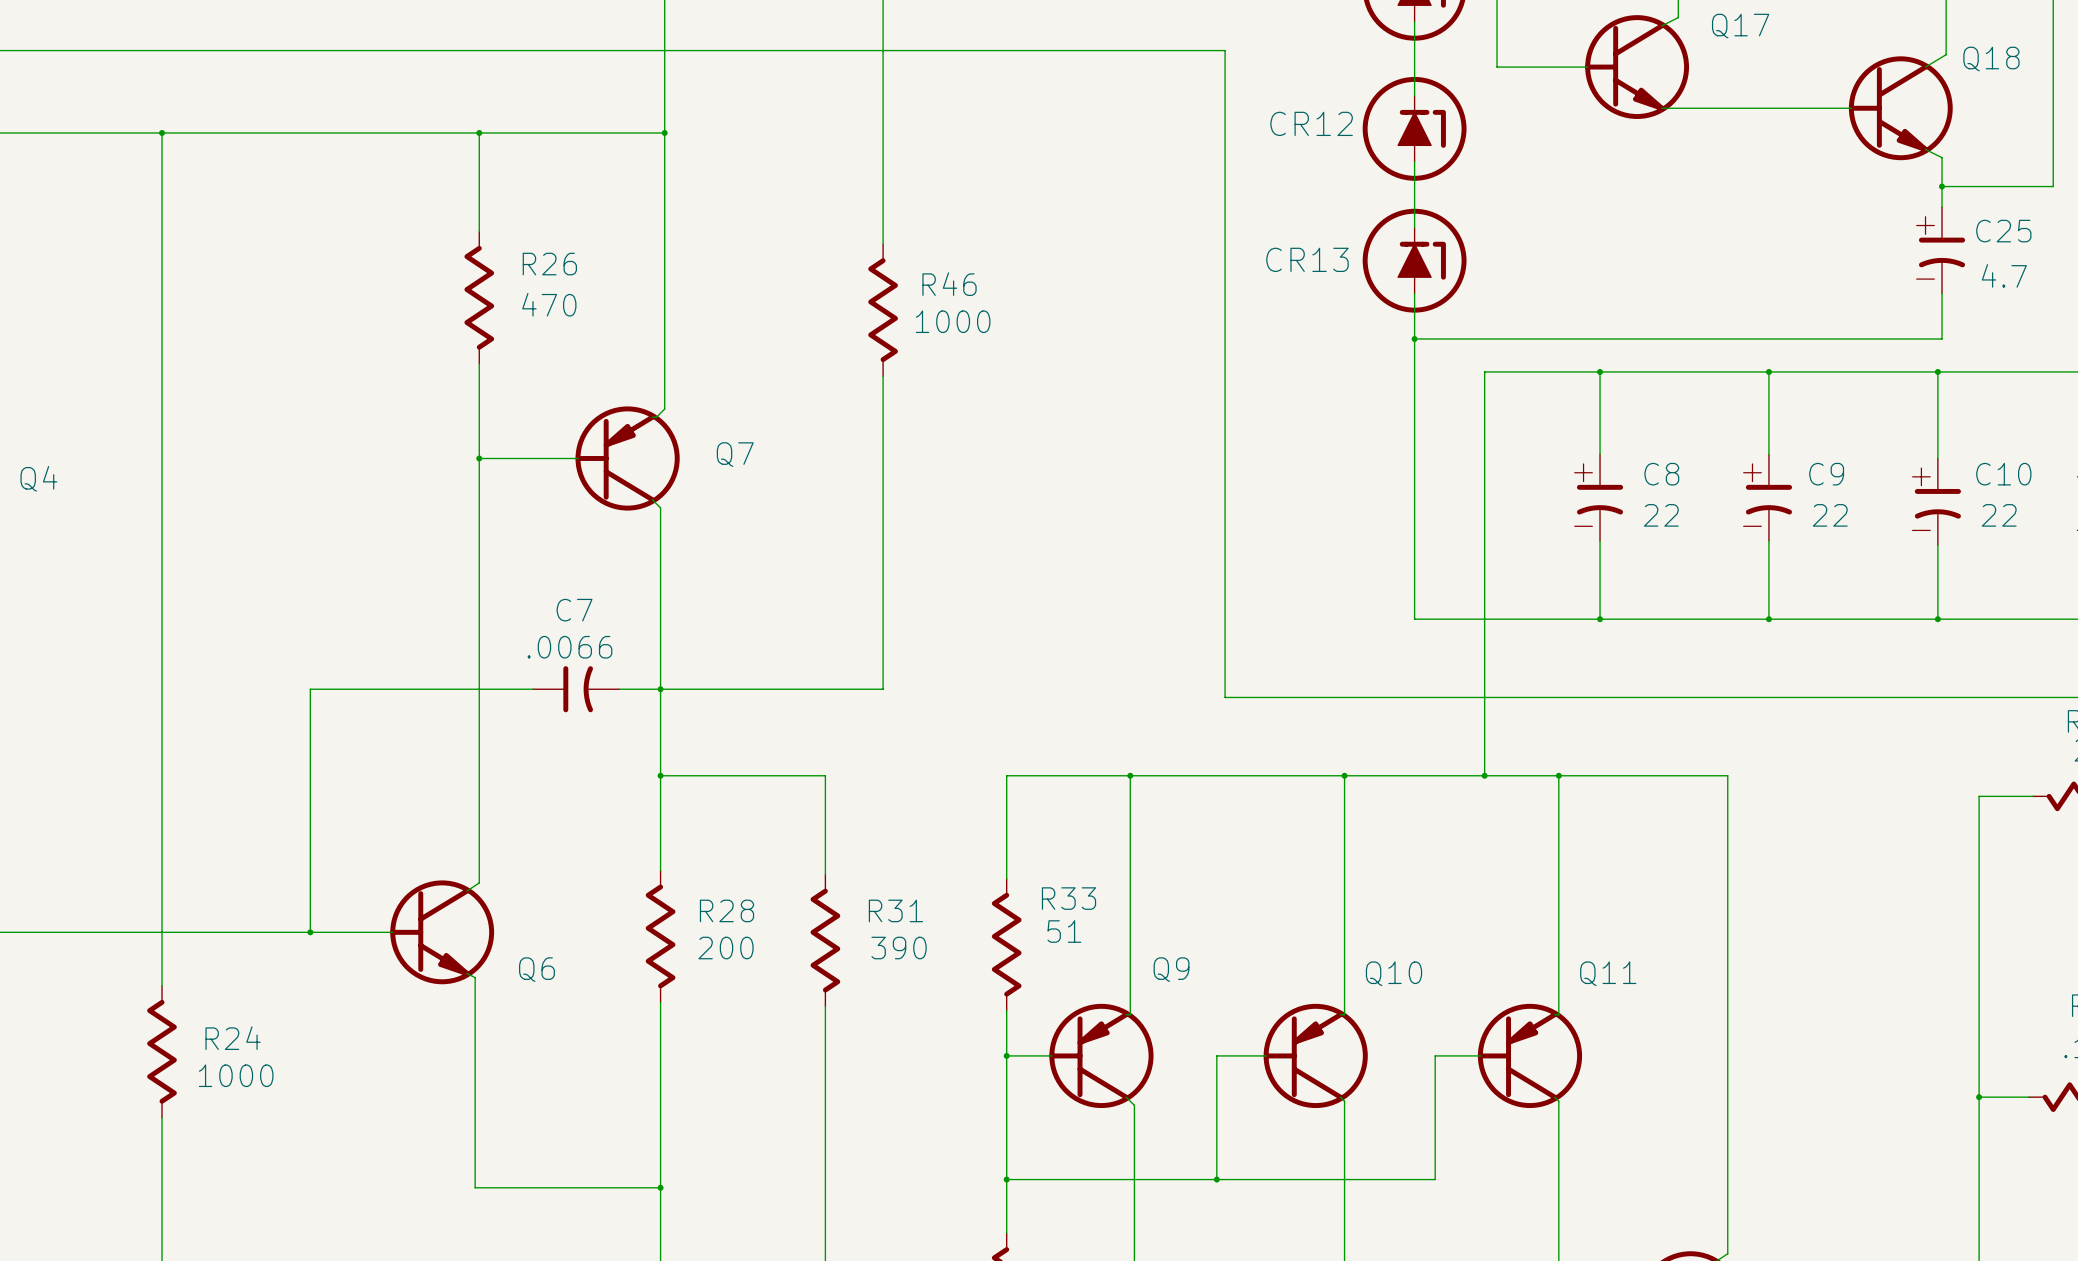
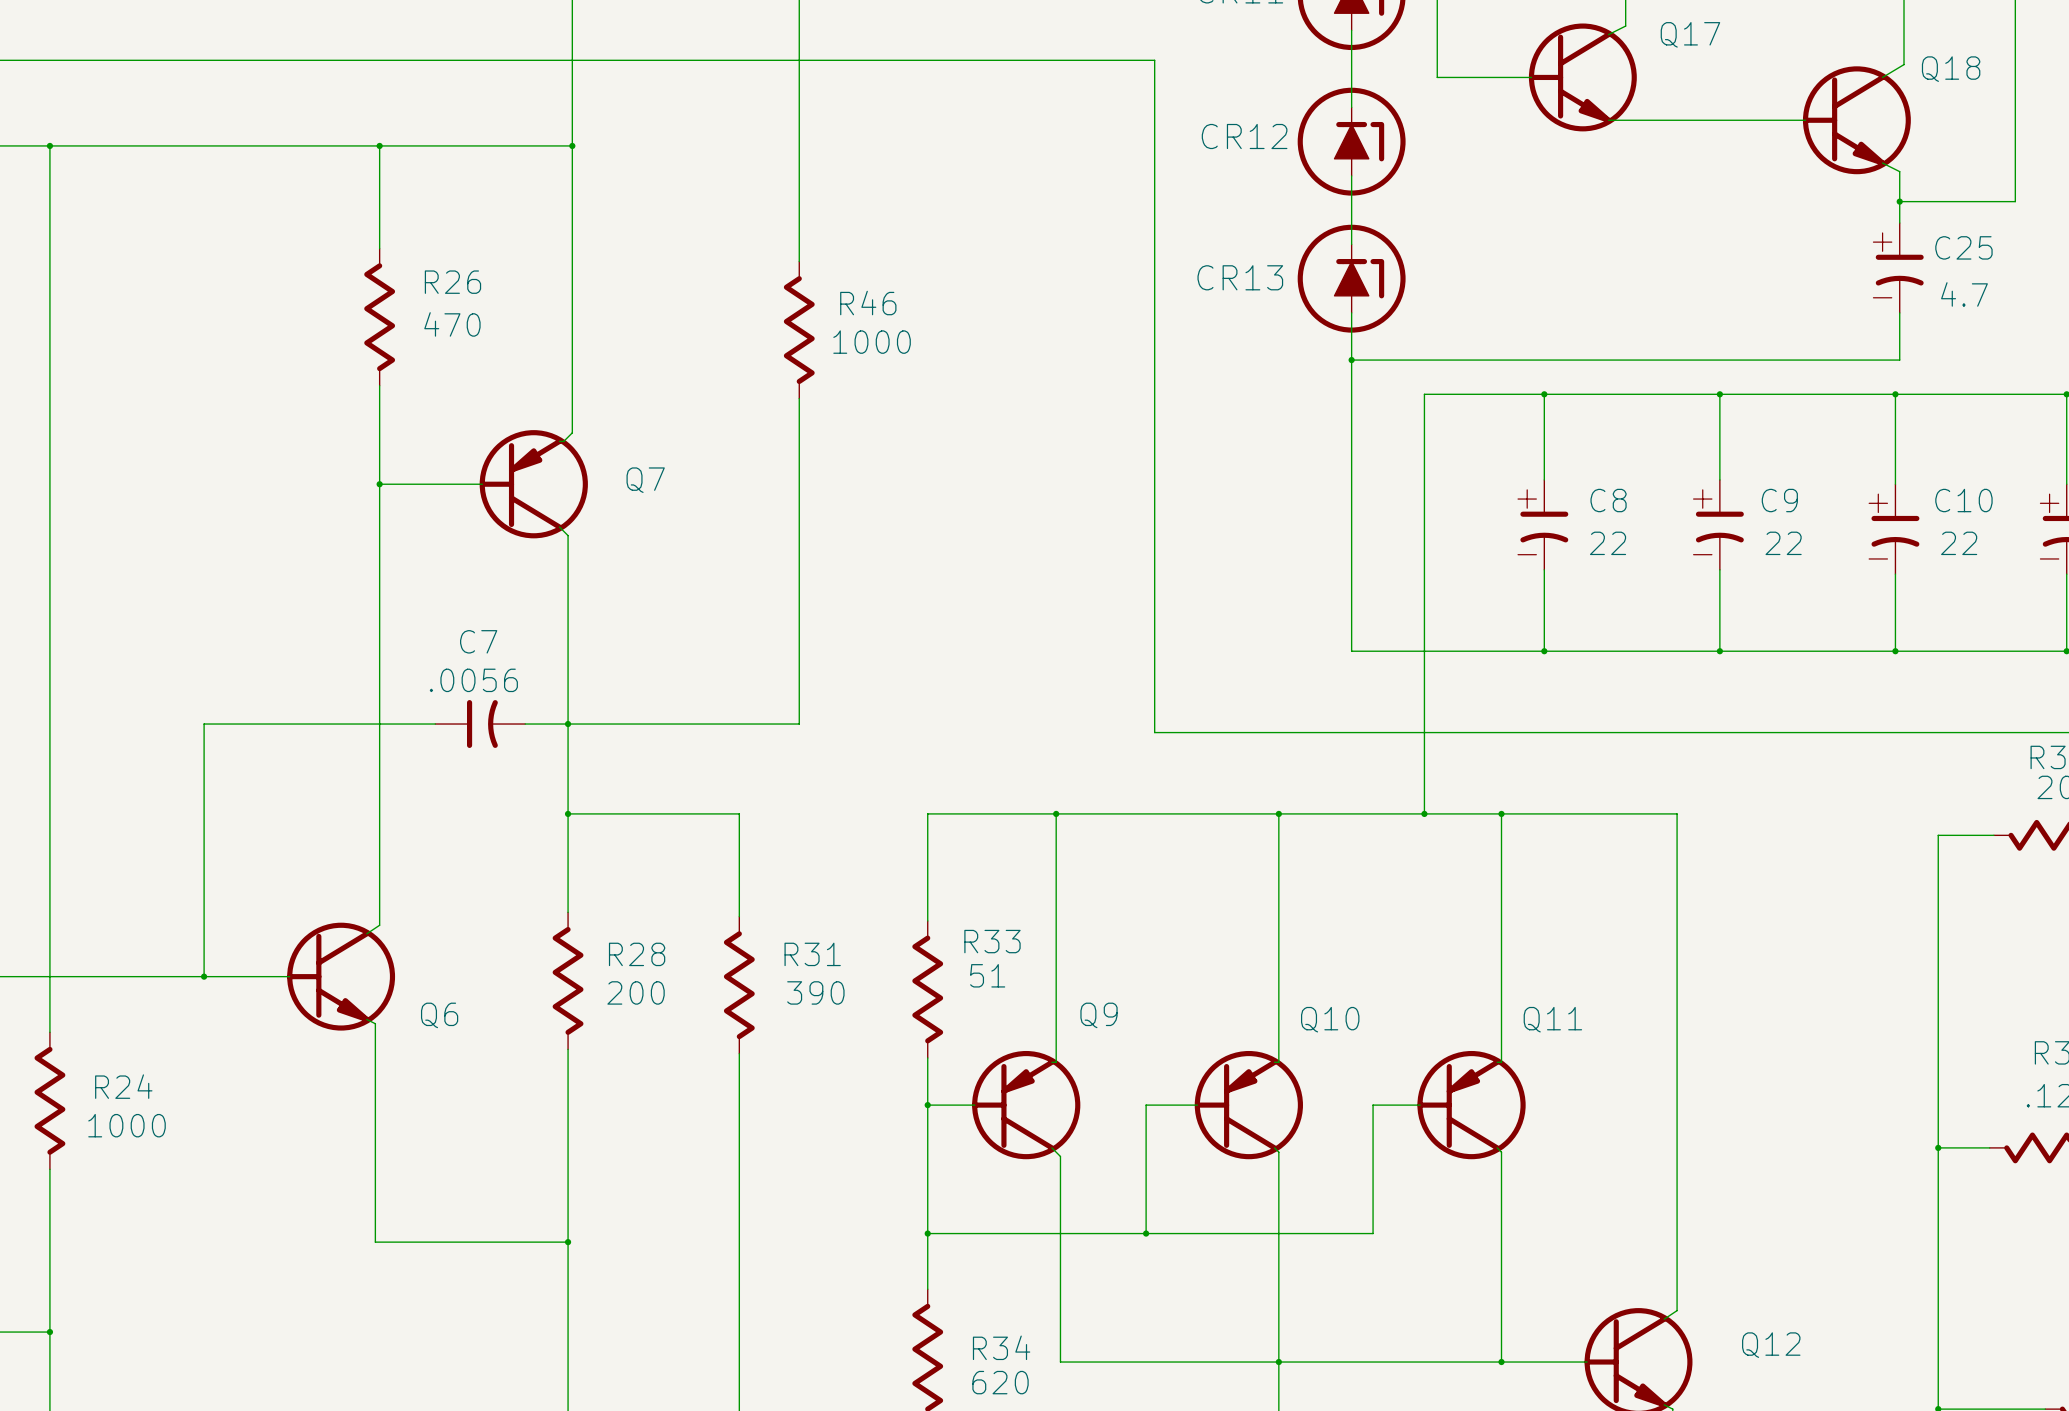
C7 value: .0066 (569, 647) -> .0056 (473, 680)

